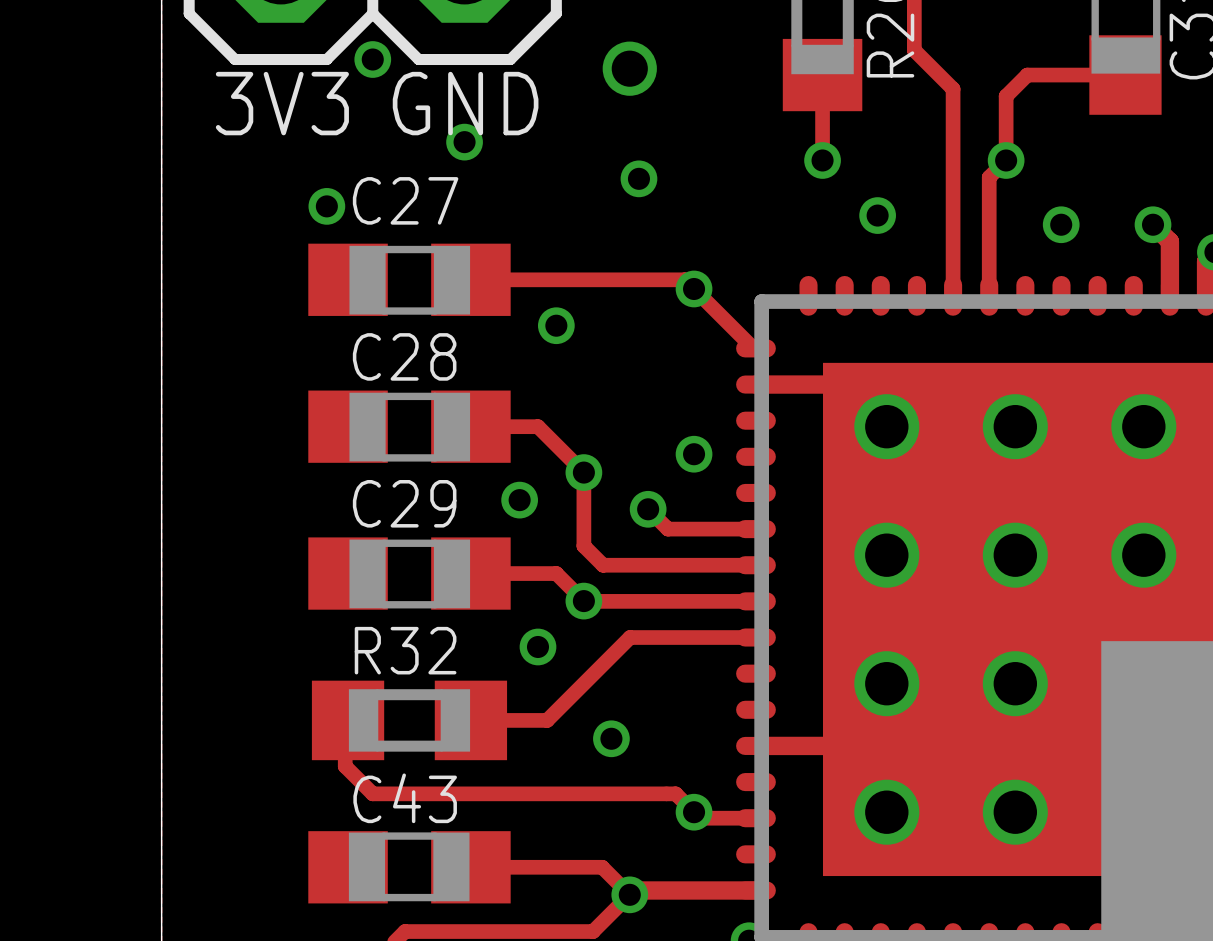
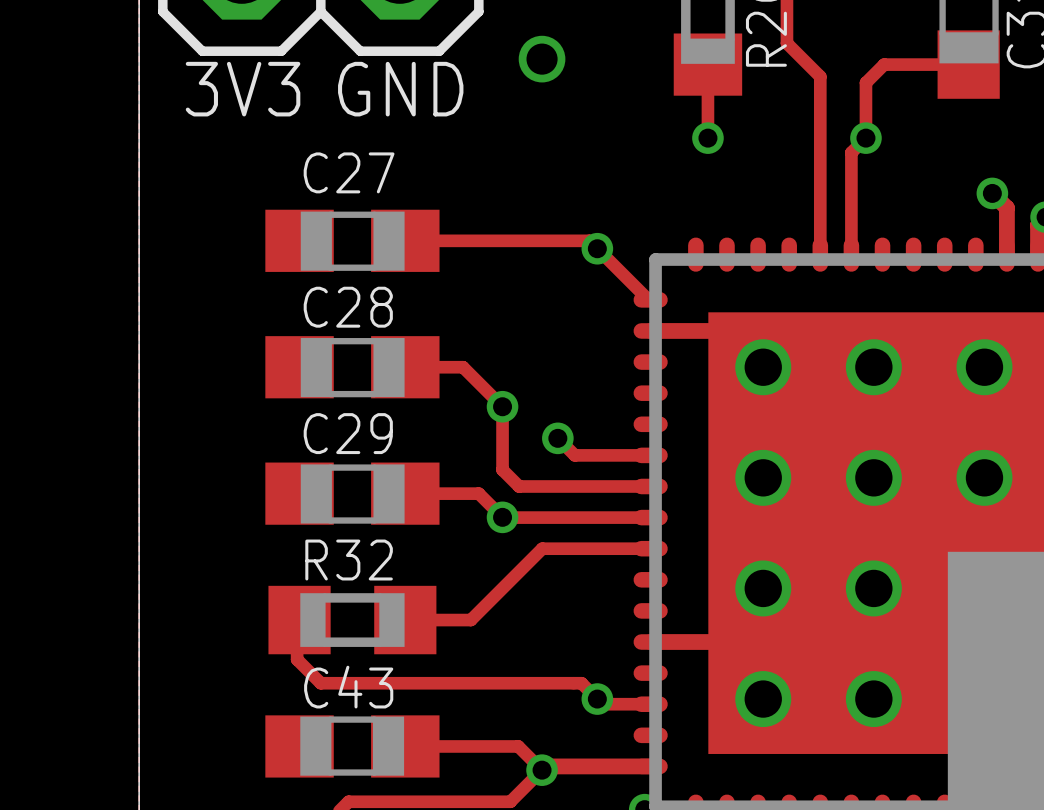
via: (372, 59) -> none
via: (464, 142) -> none
via: (638, 178) -> none
via: (326, 206) -> none
via: (877, 215) -> none
via: (1061, 224) -> none
via: (556, 325) -> none
via: (694, 454) -> none
via: (519, 500) -> none
via: (537, 646) -> none
via: (611, 738) -> none

